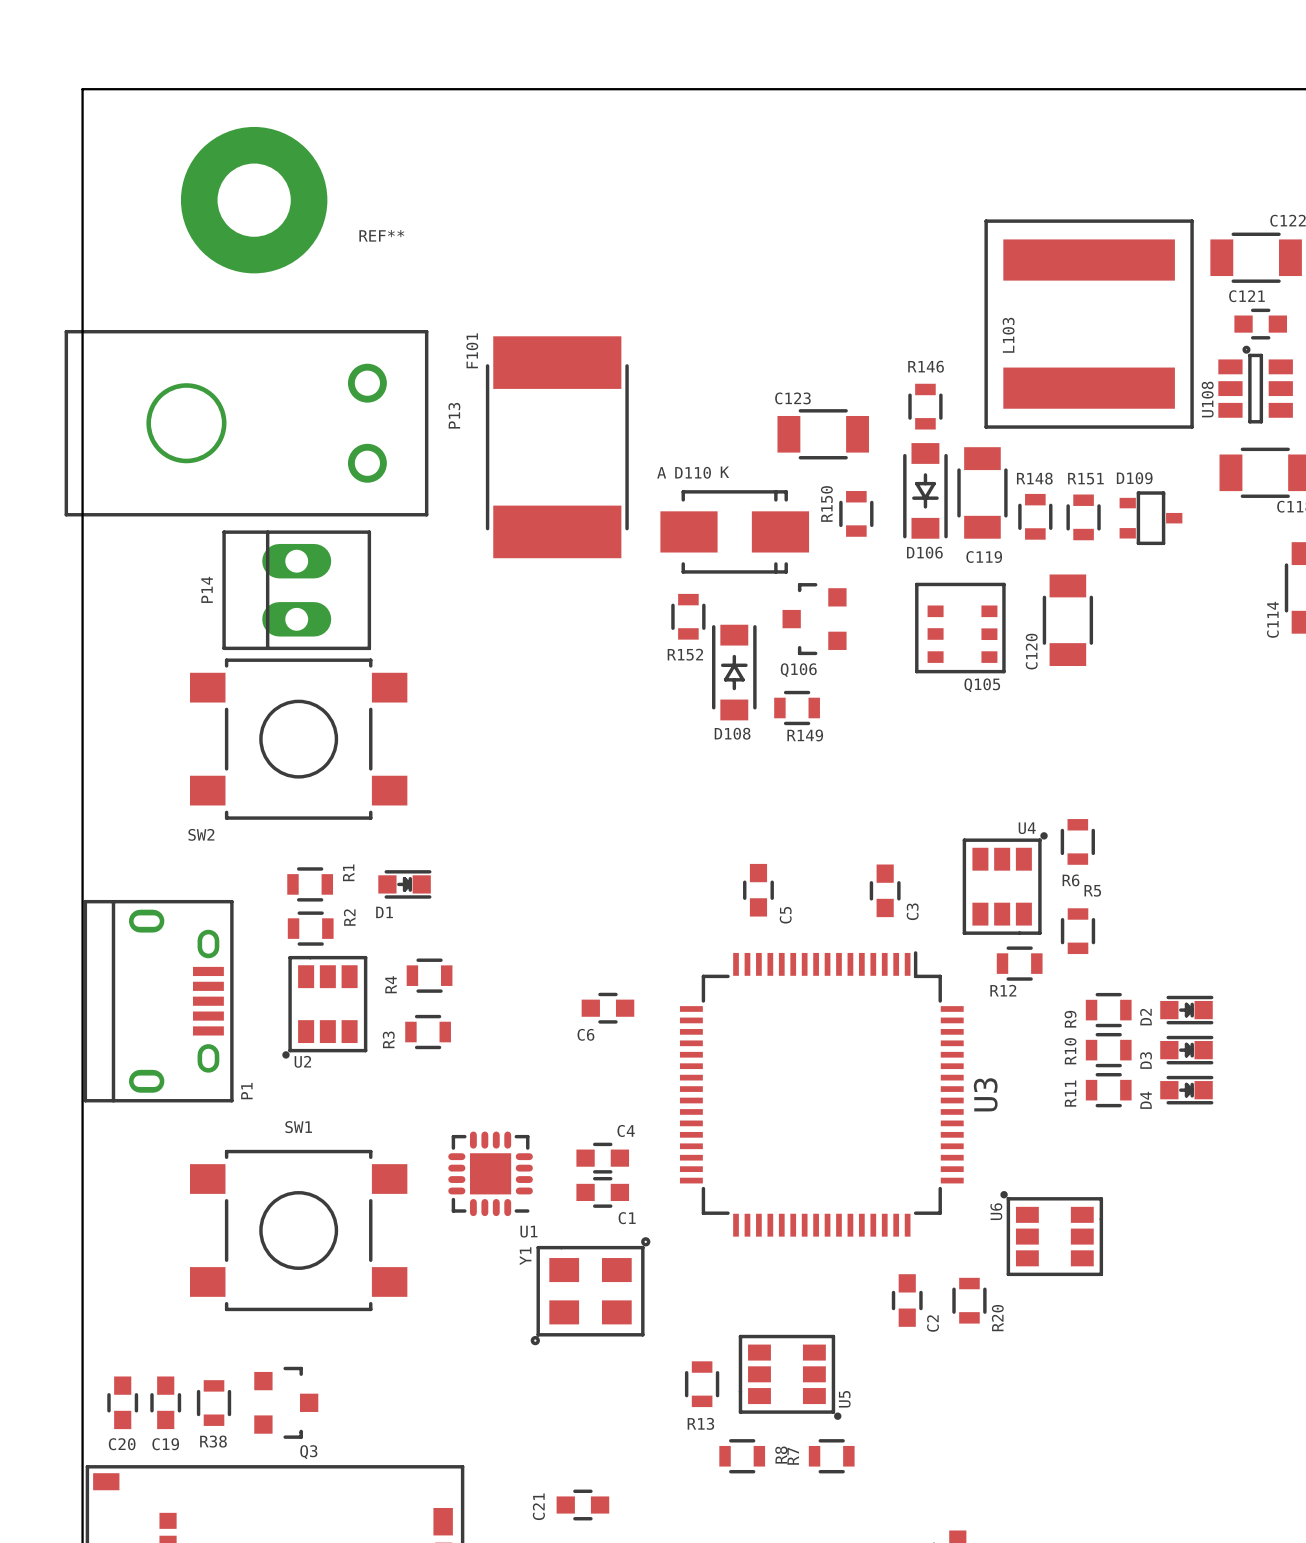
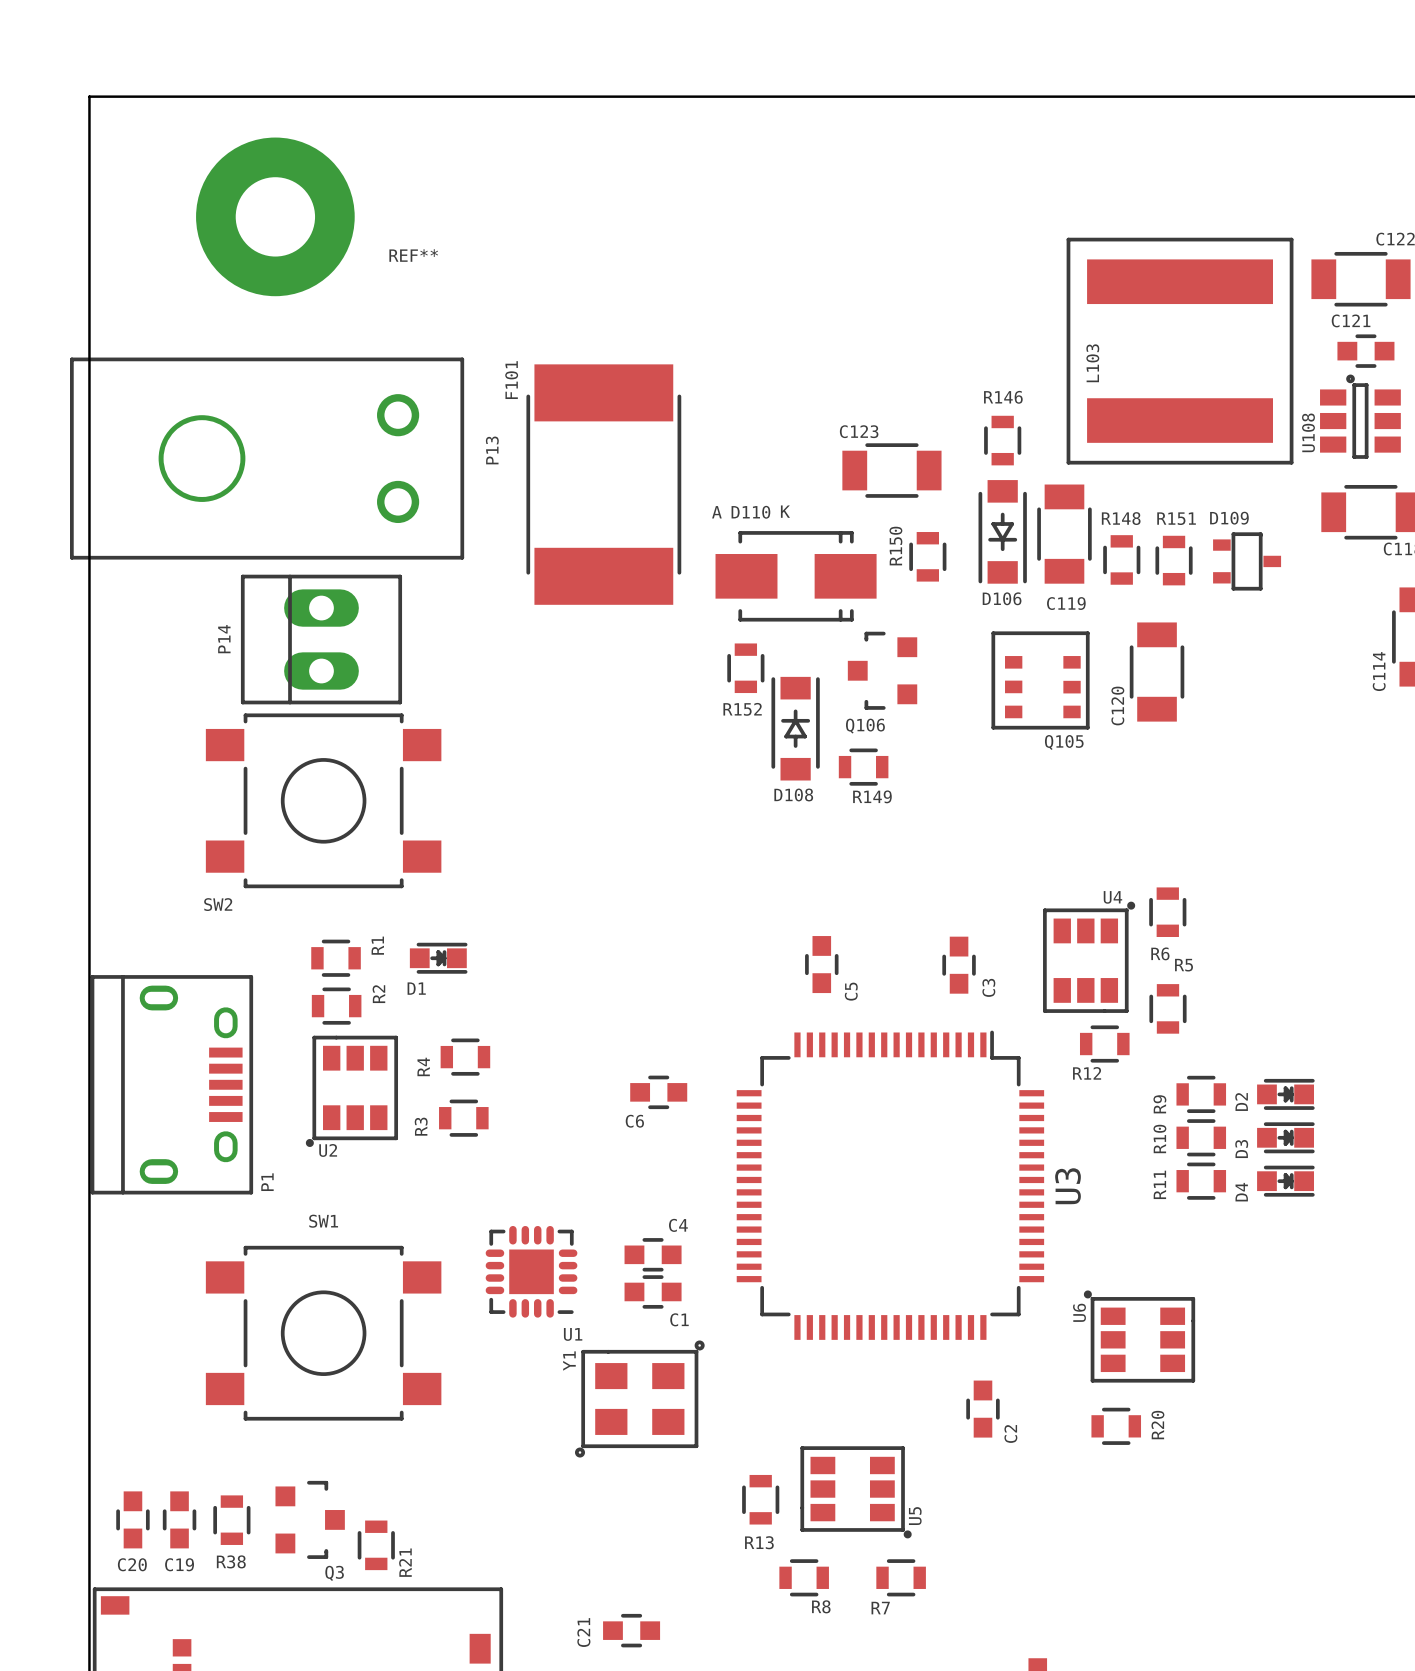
R20 rotation: 0° (969, 1300) -> 90° clockwise (1116, 1426)
R20 position: (969, 1300) -> (1116, 1426)
R21: none -> (376, 1545)
R8 name rotation: 0° (781, 1455) -> 90° clockwise (821, 1606)
R8 name position: R8 (781, 1455) -> R8 (821, 1606)
R7 name rotation: 0° (793, 1456) -> 90° clockwise (880, 1608)
R7 name position: R7 (793, 1456) -> R7 (880, 1608)

